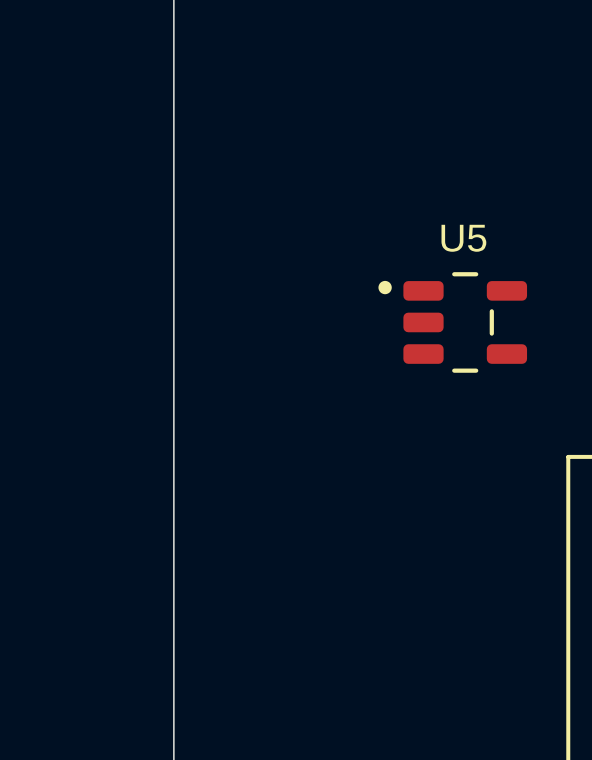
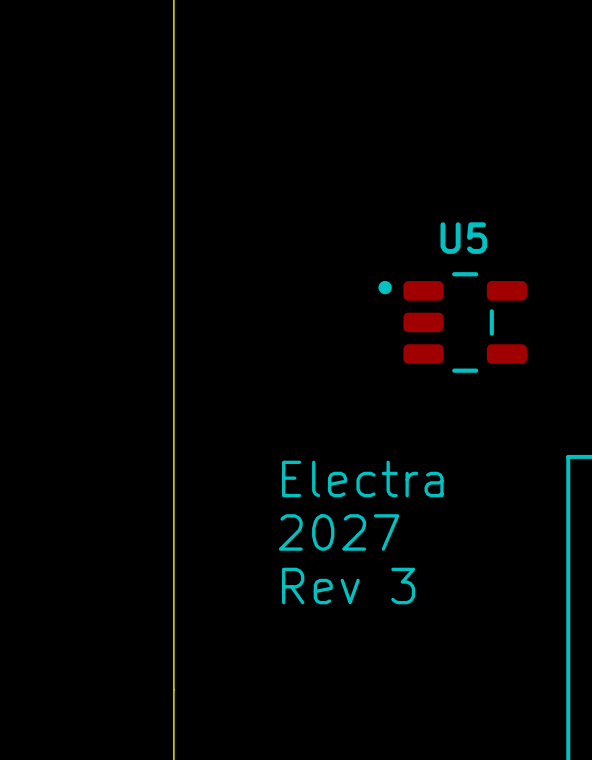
text: none -> Electra (362, 478)
text: none -> 2027 (339, 532)
text: none -> Rev 3 (348, 585)

